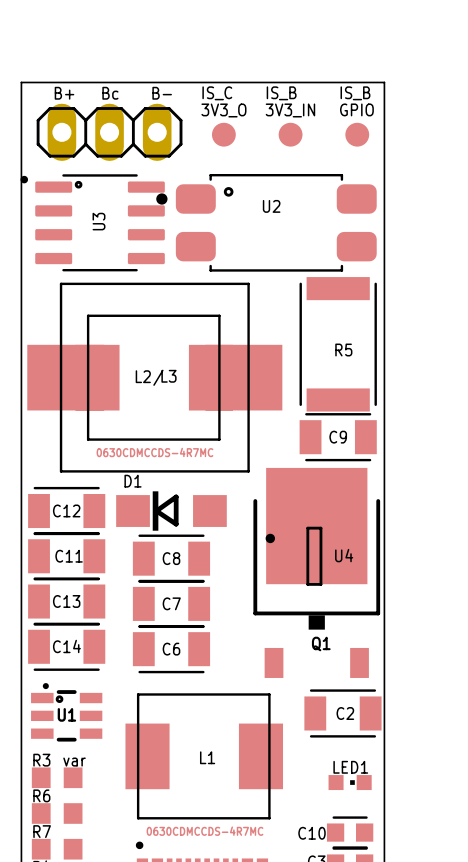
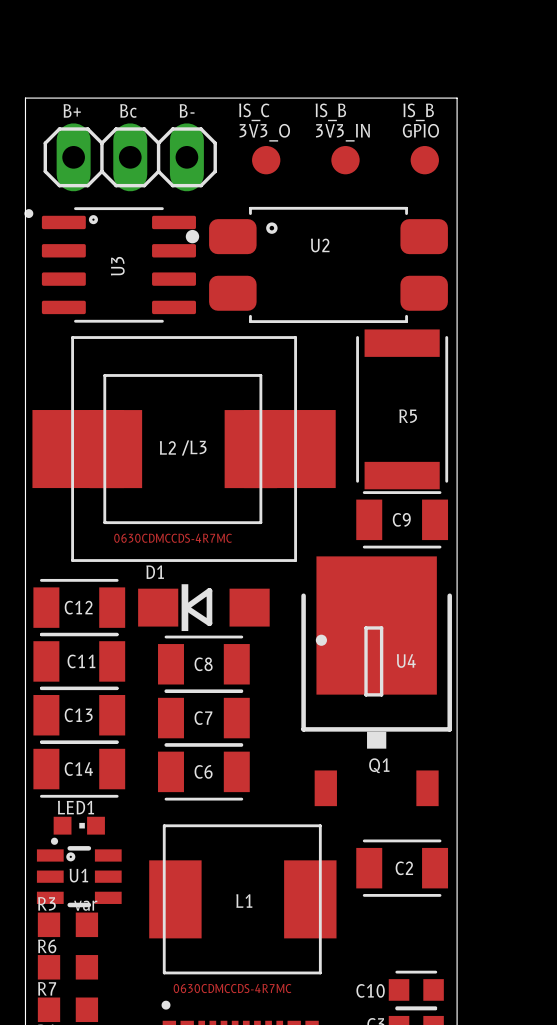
drawing position: (59, 699) -> (70, 856)
U1 position: (66, 712) -> (79, 872)
C2 position: (342, 713) -> (402, 868)
LED1 position: (350, 782) -> (79, 825)

